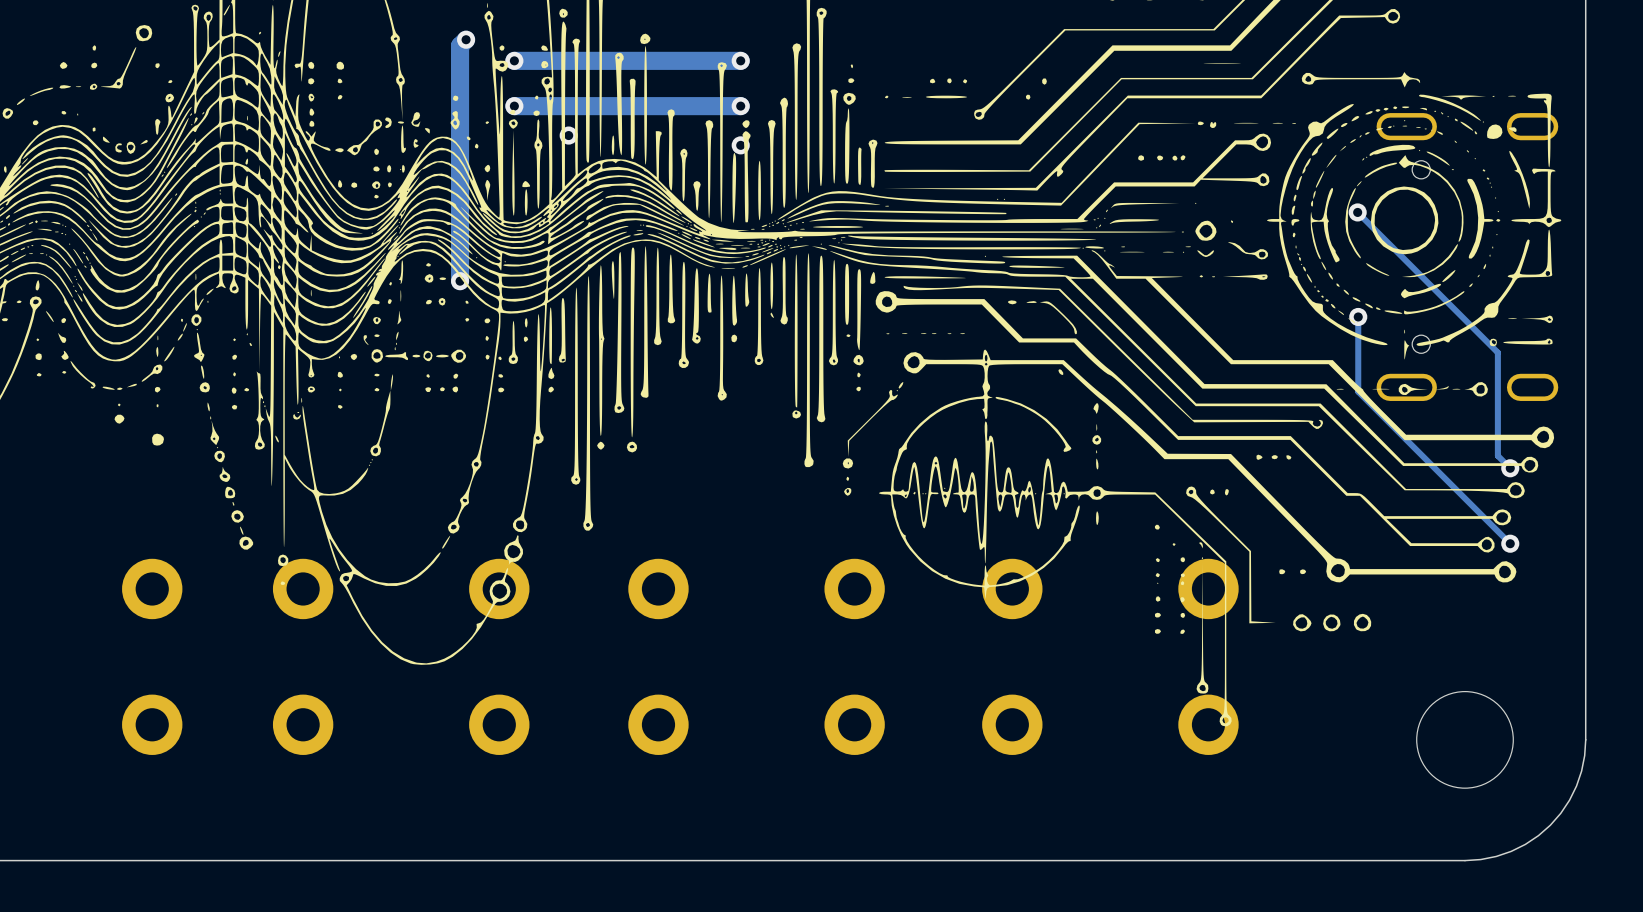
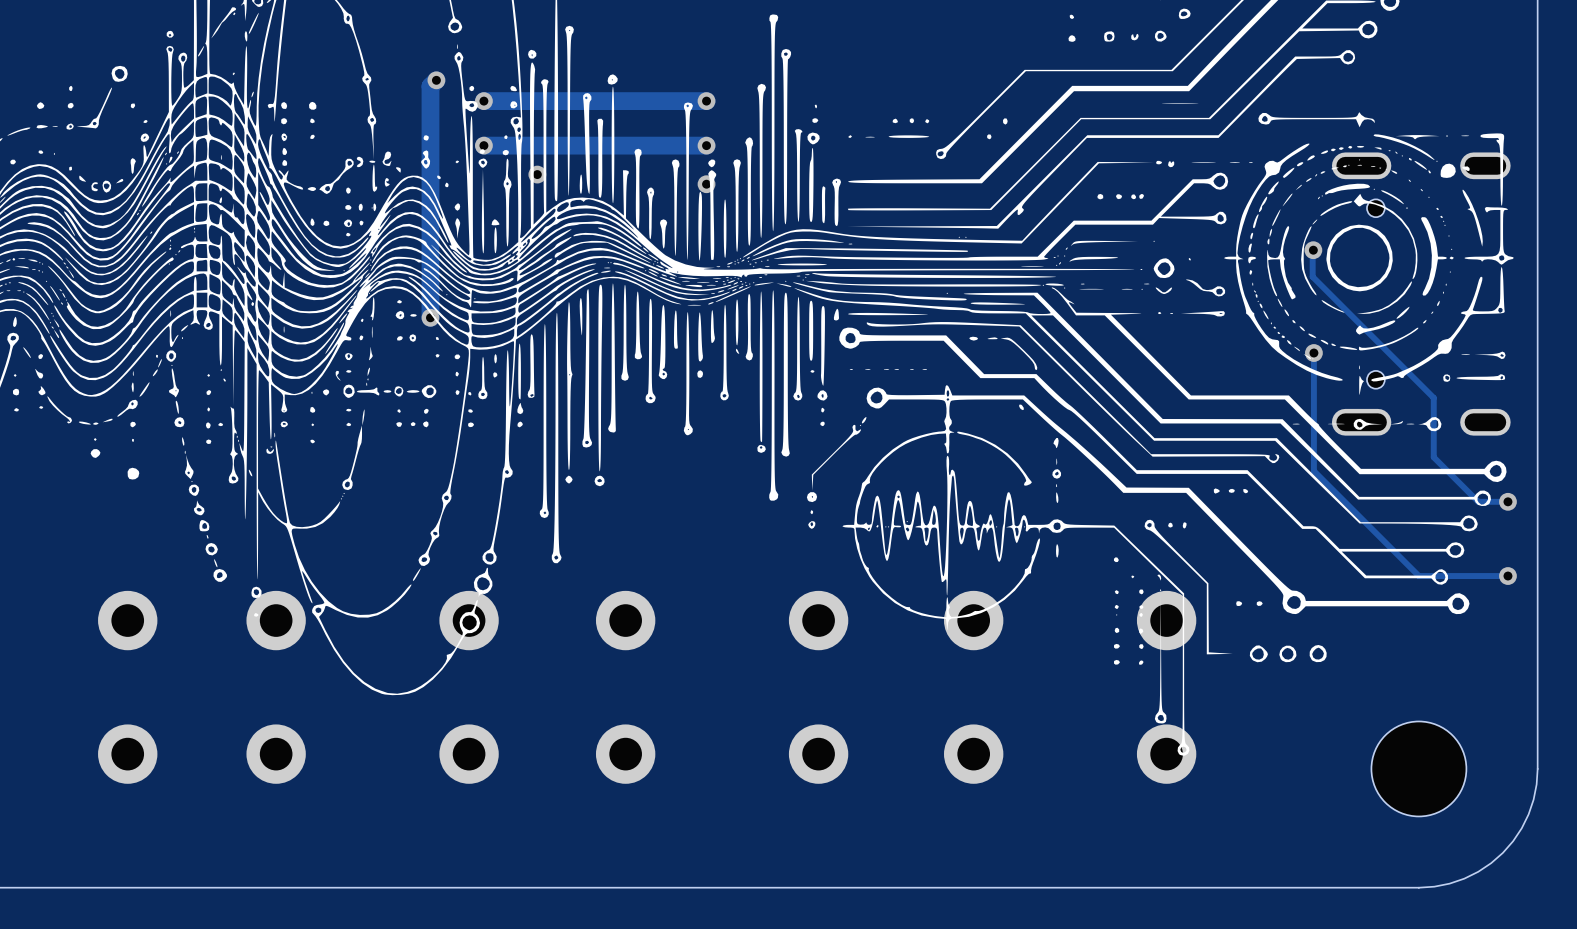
track: none -> (1312, 247) (1312, 276) (1433, 397) (1433, 457) (1478, 501) (1507, 501)
track: (1357, 212) (1497, 352) (1497, 455) (1510, 468) -> none
track: (1358, 391) (1510, 543) -> (1313, 426) (1313, 471) (1418, 576) (1507, 576)
via: (1510, 468) -> none
via: none -> (1507, 501)
via: (1510, 543) -> none
via: none -> (1507, 576)

